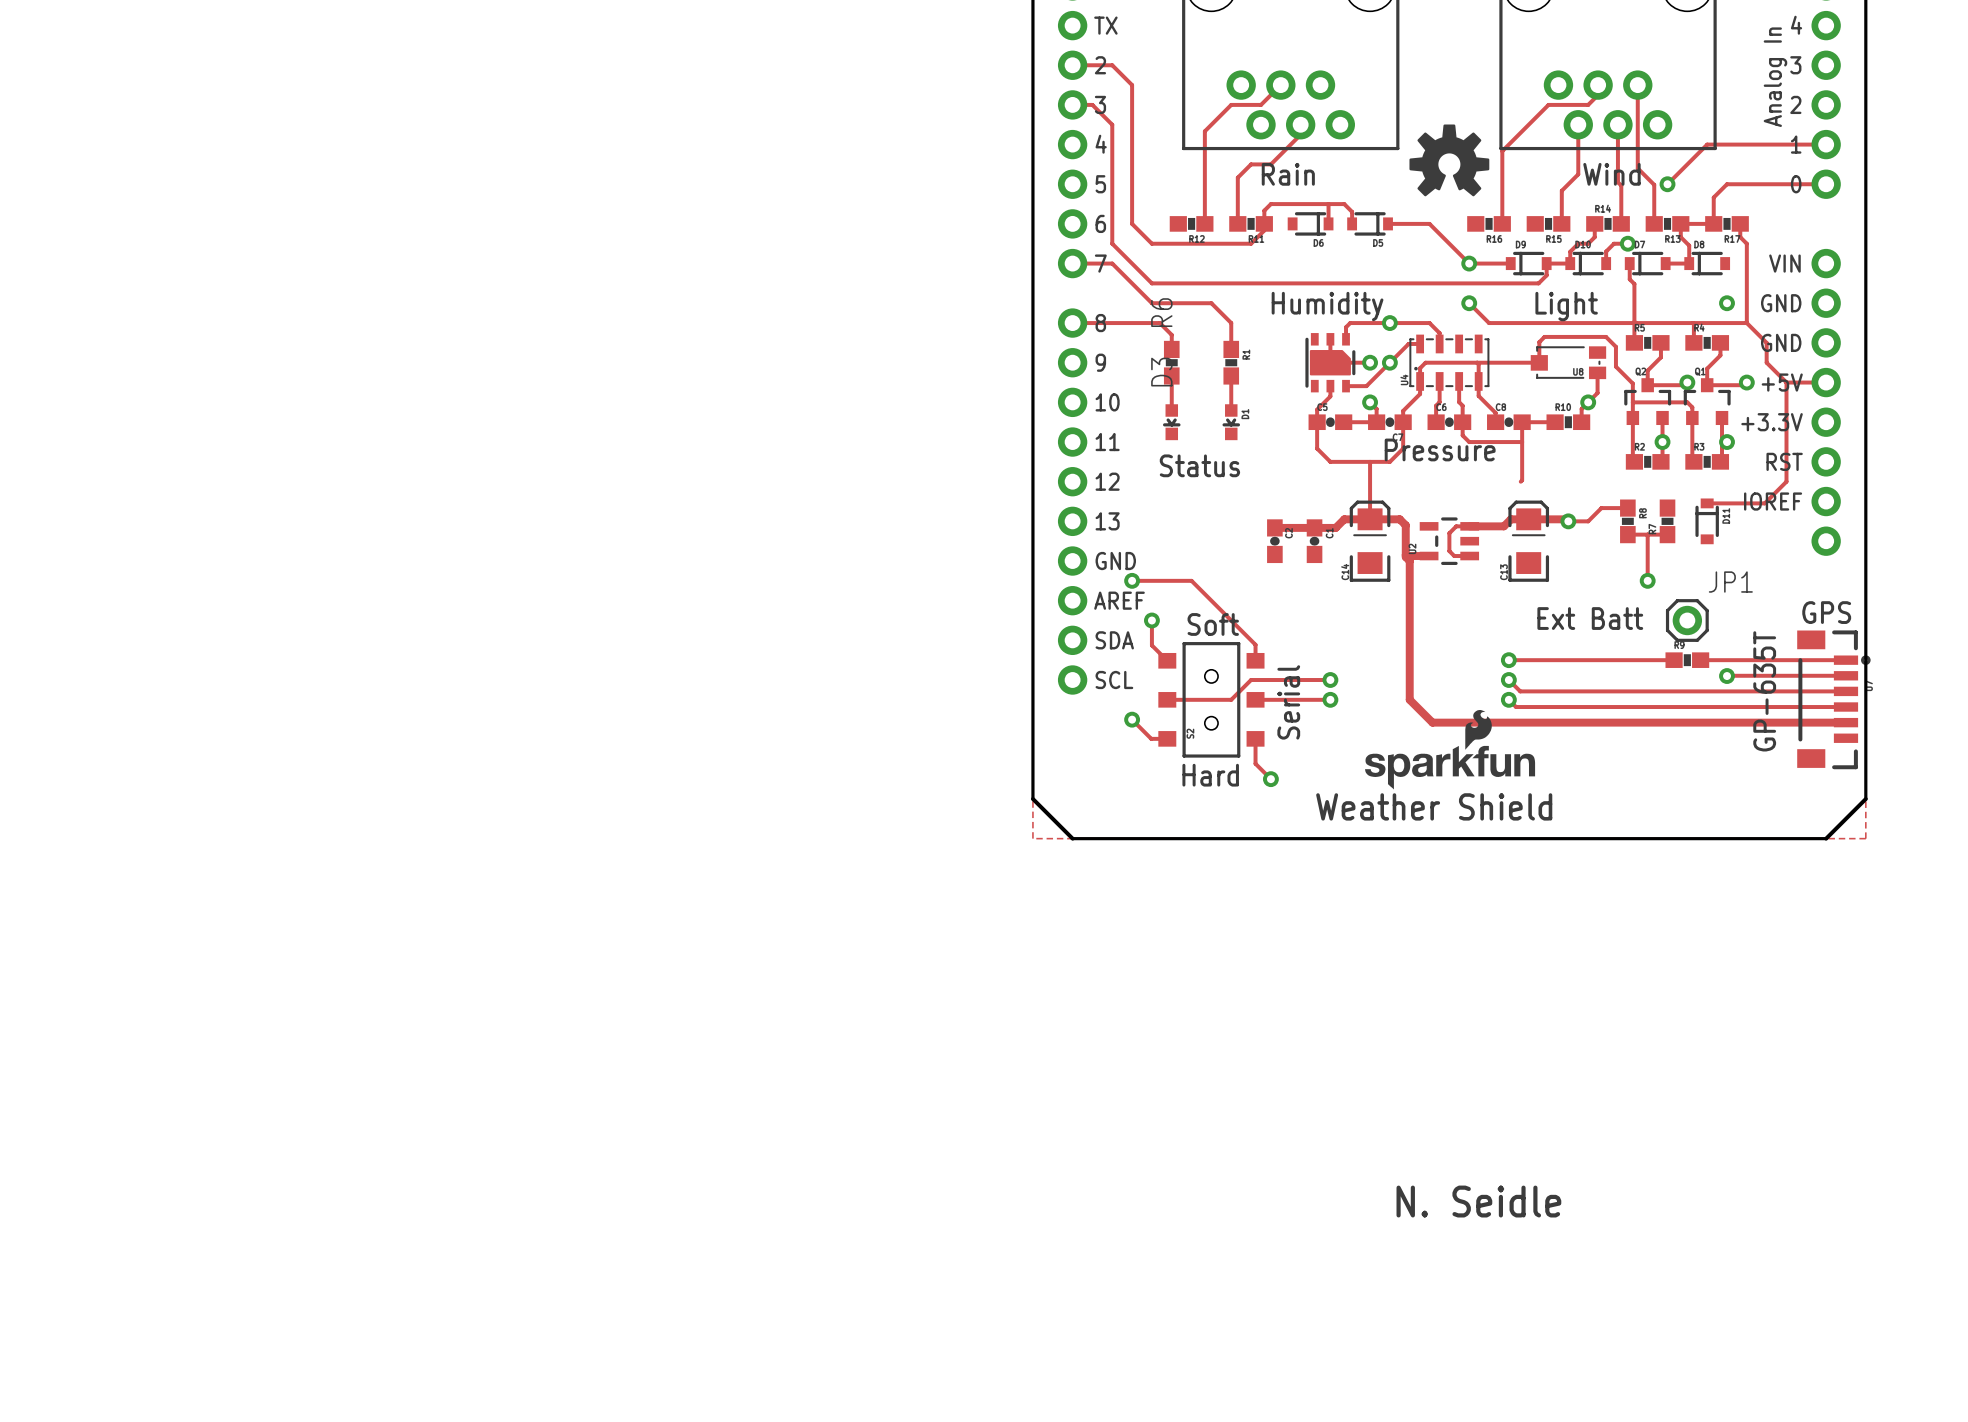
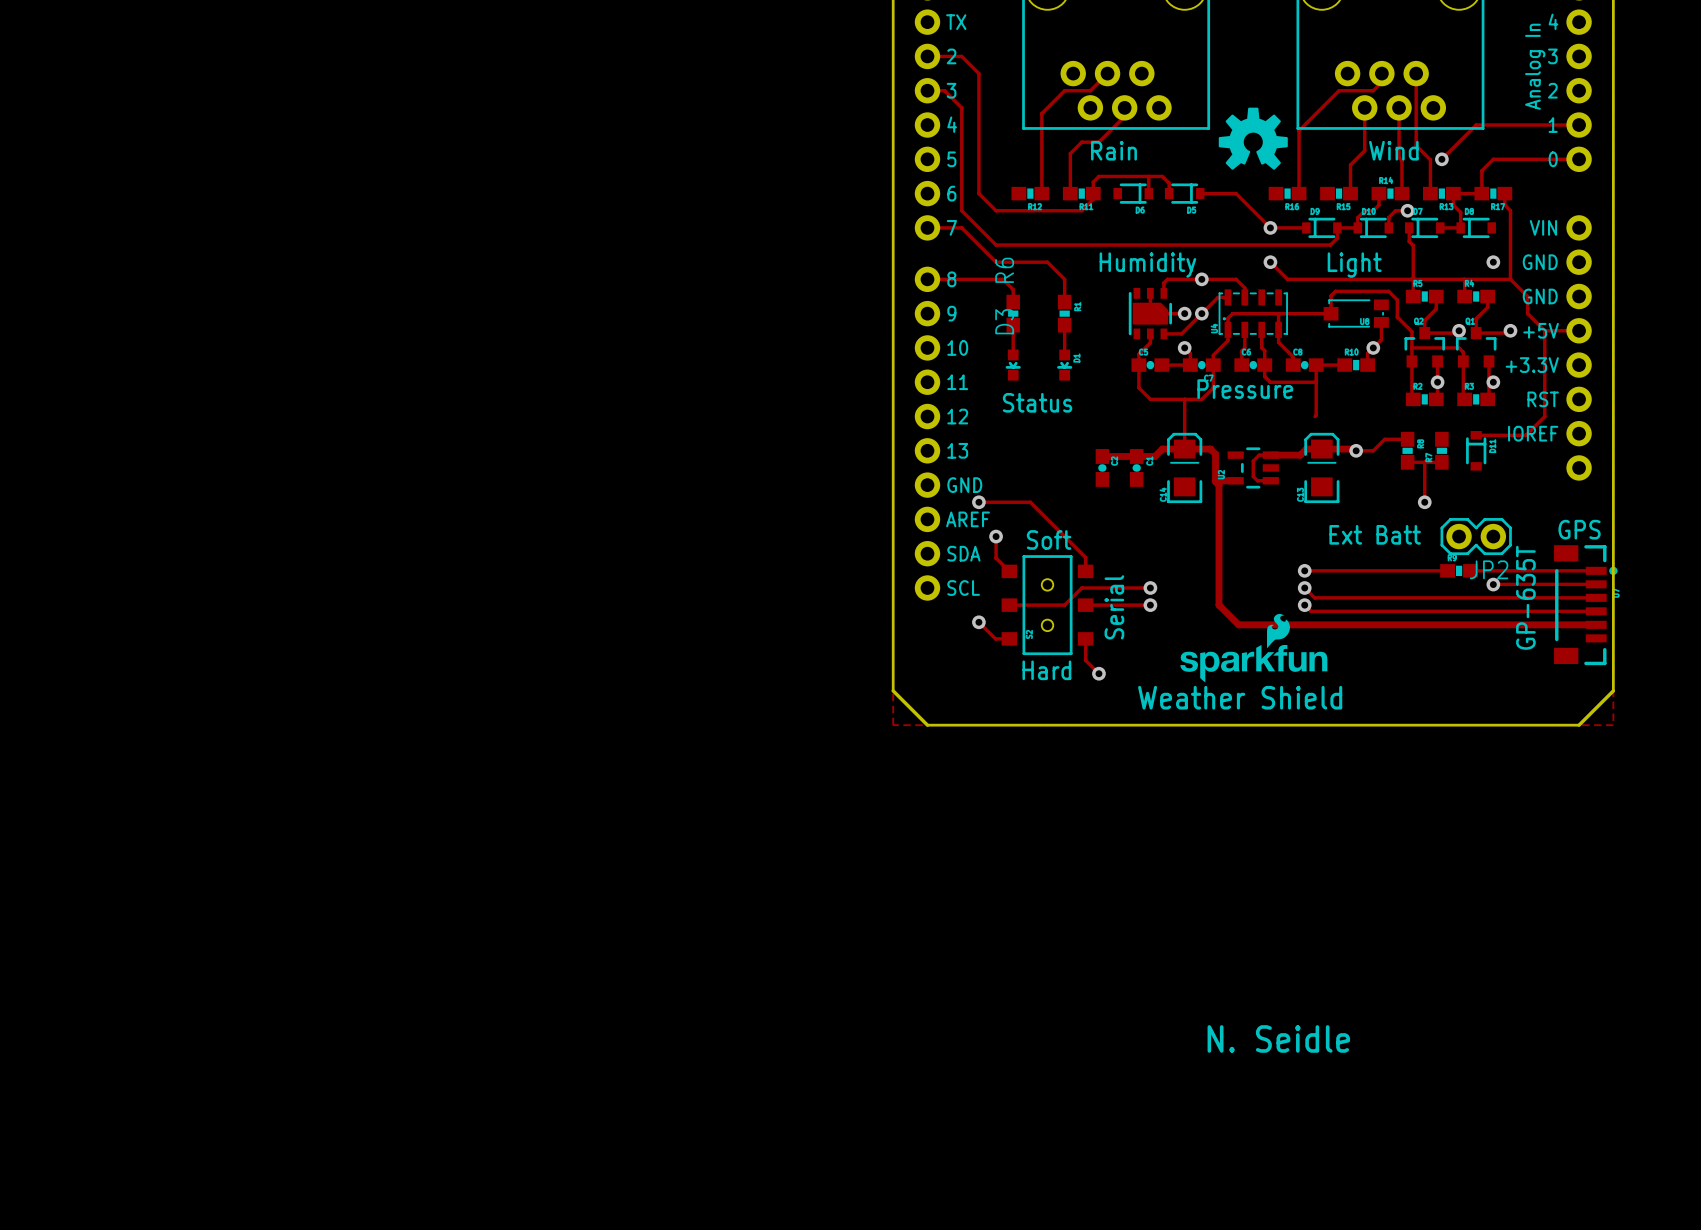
JP1: (1687, 620) -> none
JP2: none -> (1476, 536)

